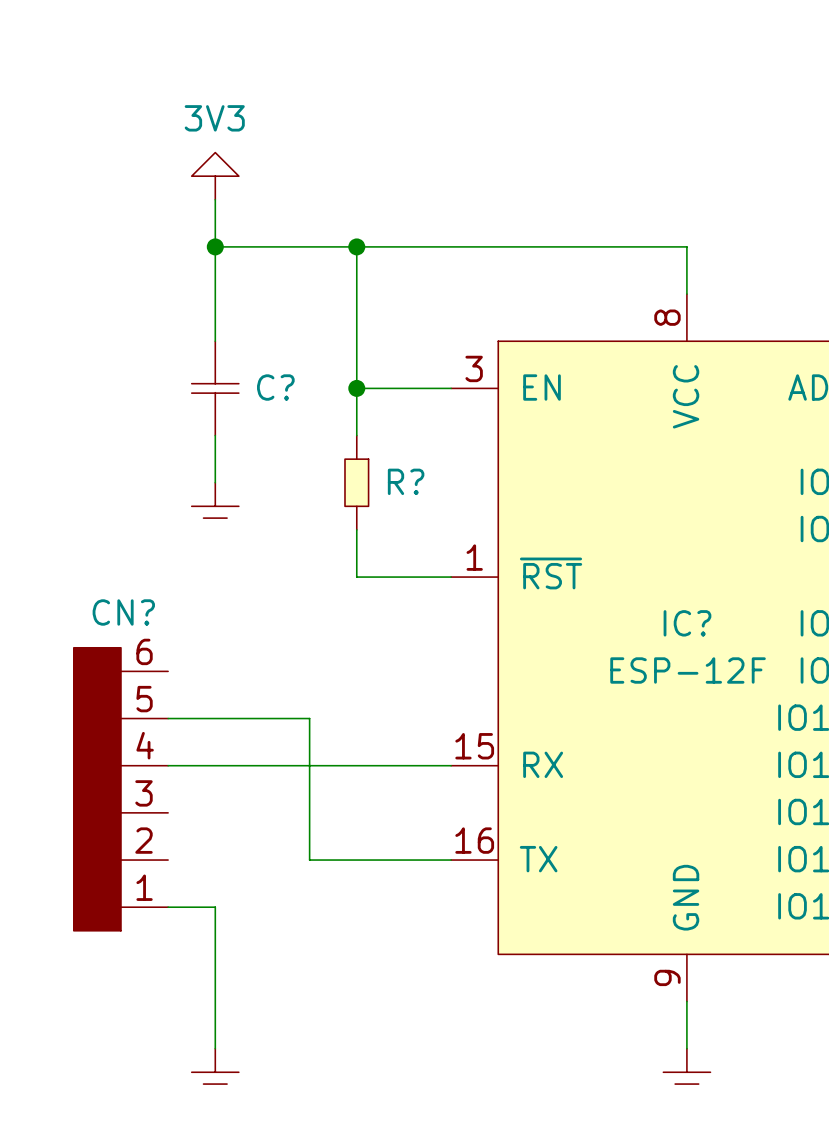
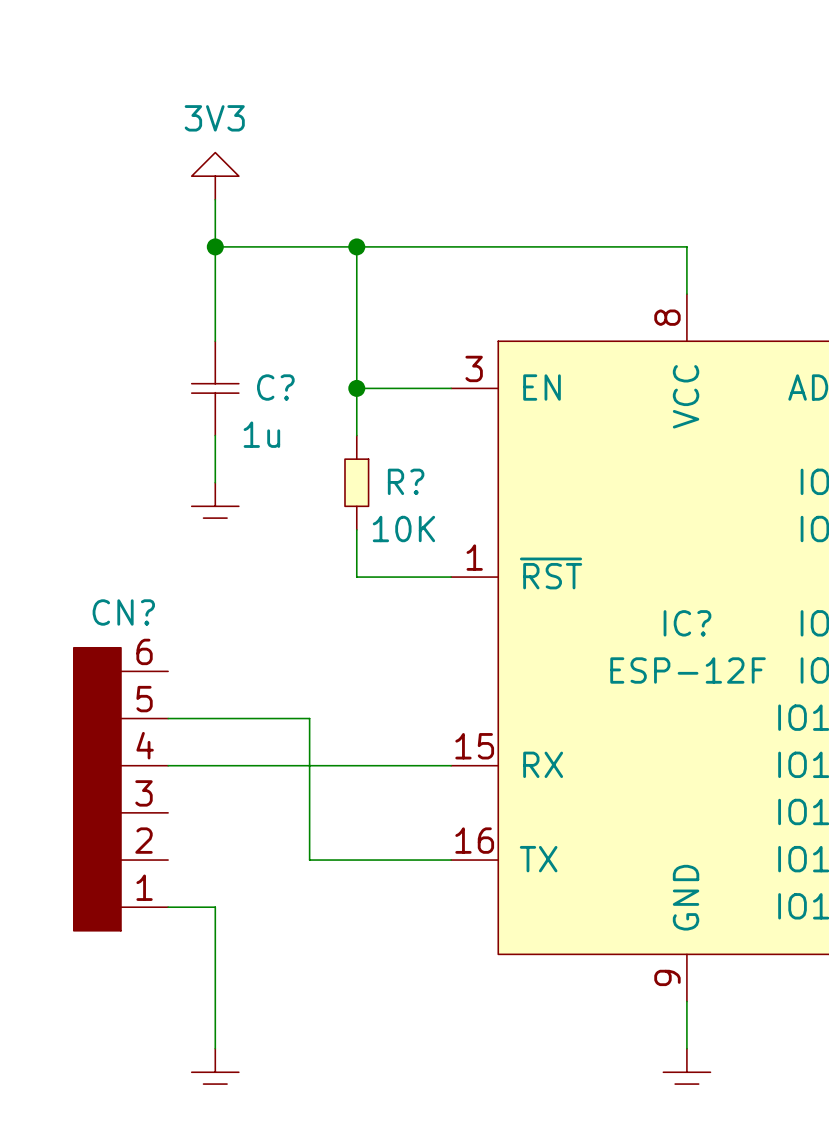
C? value: none -> 1u (261, 434)
R? value: none -> 10K (403, 529)

